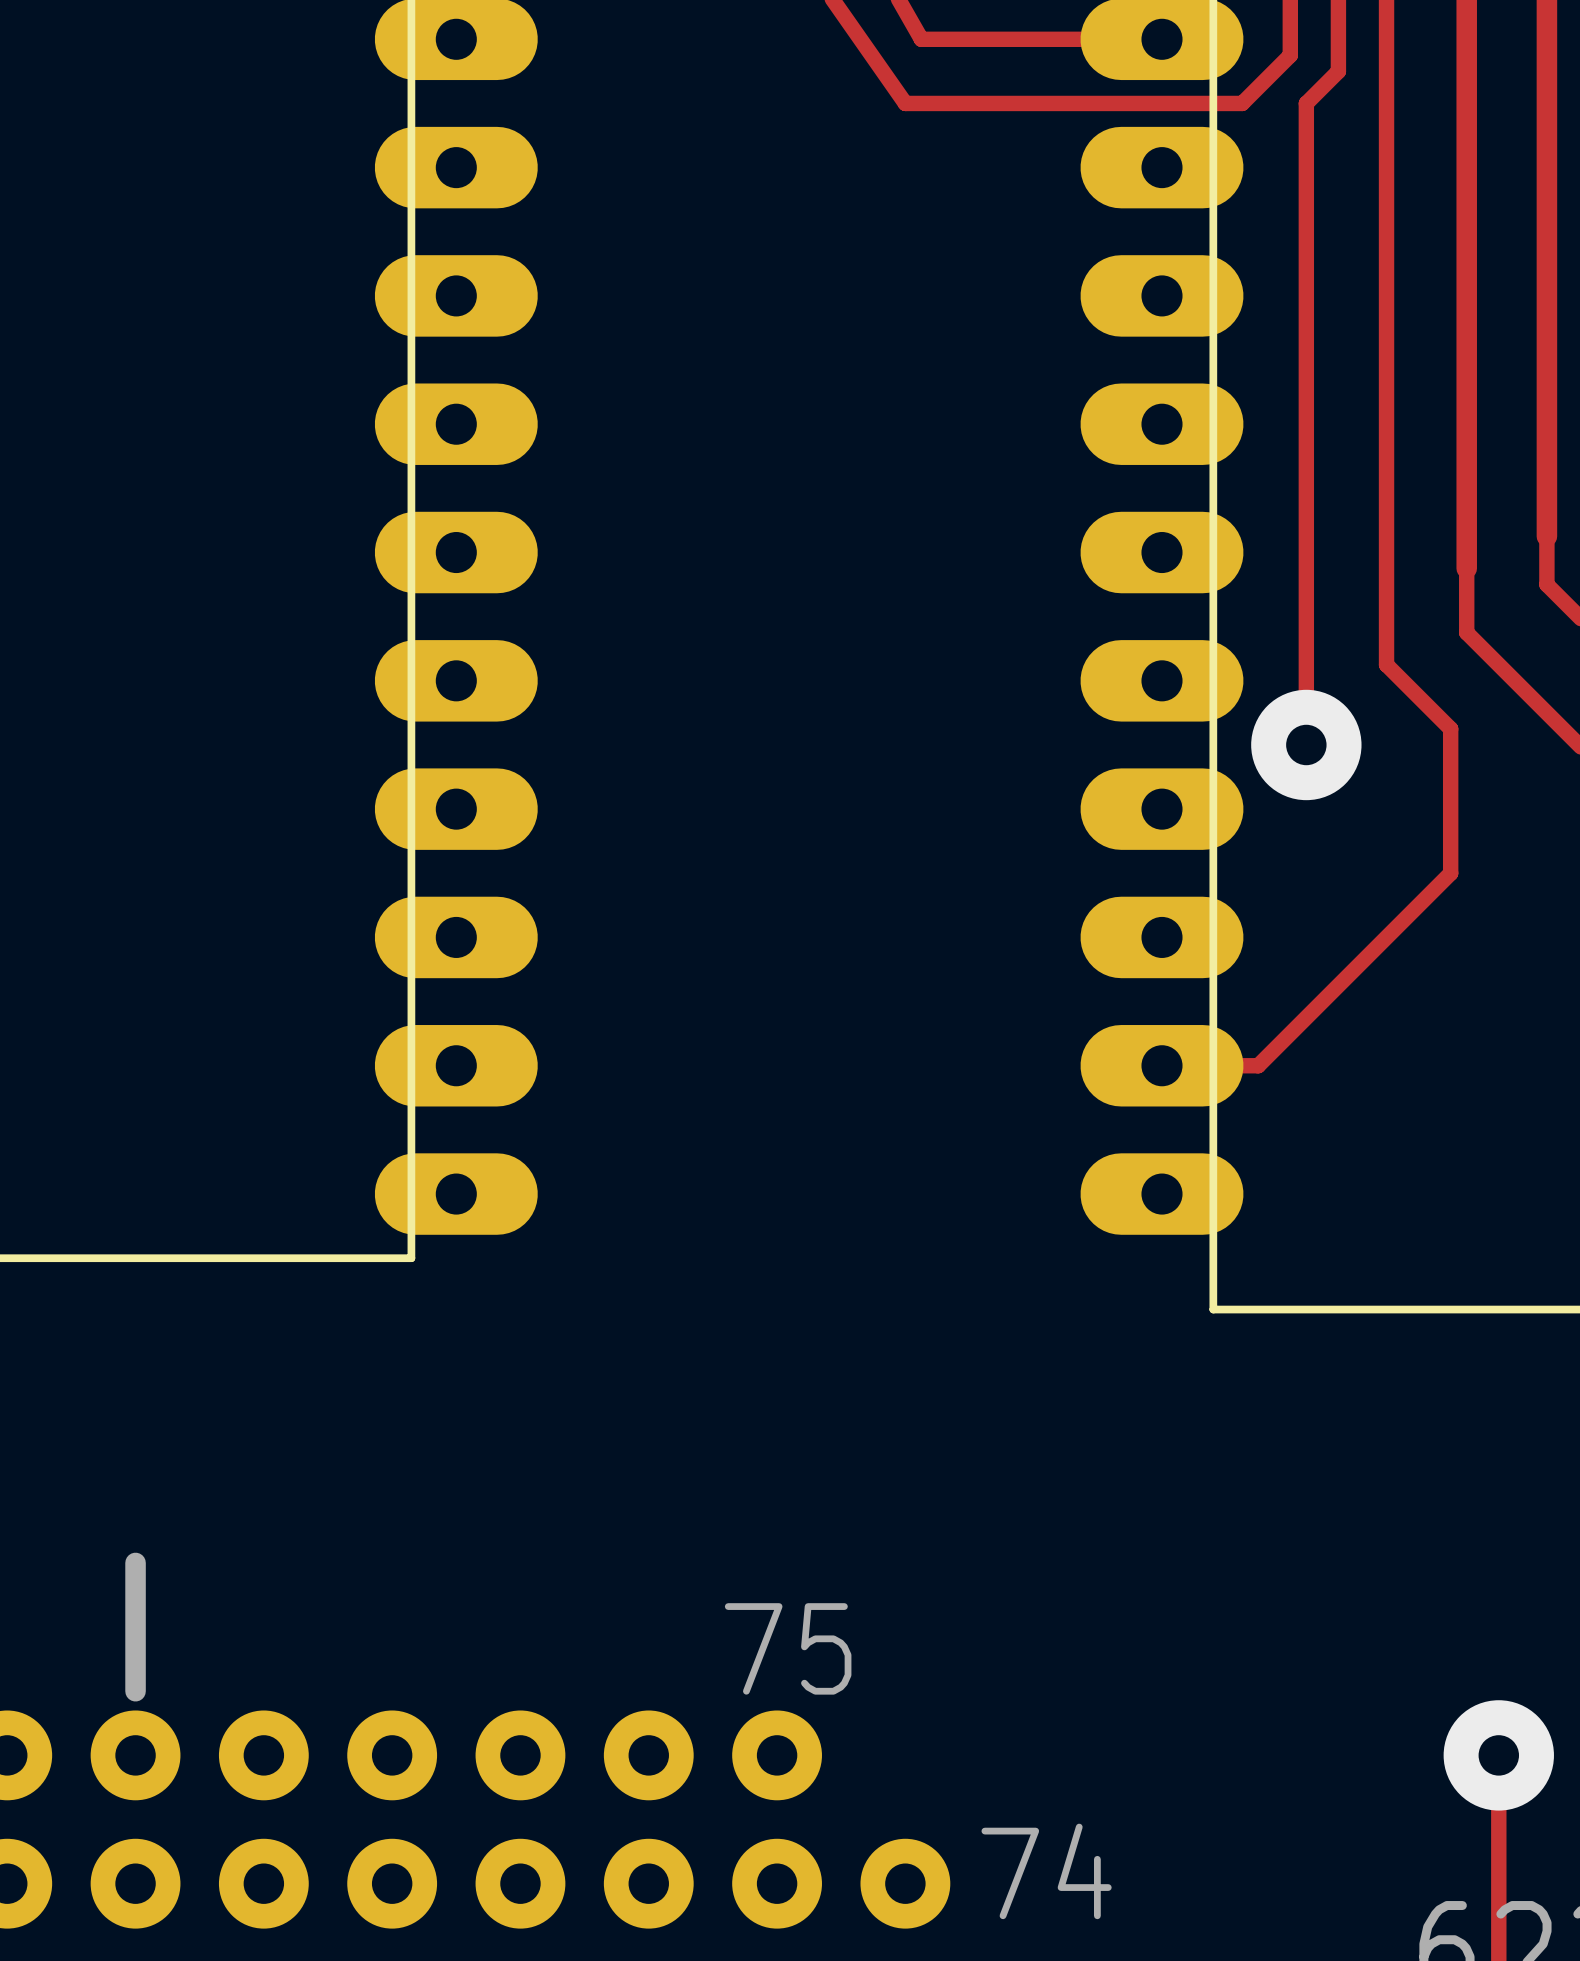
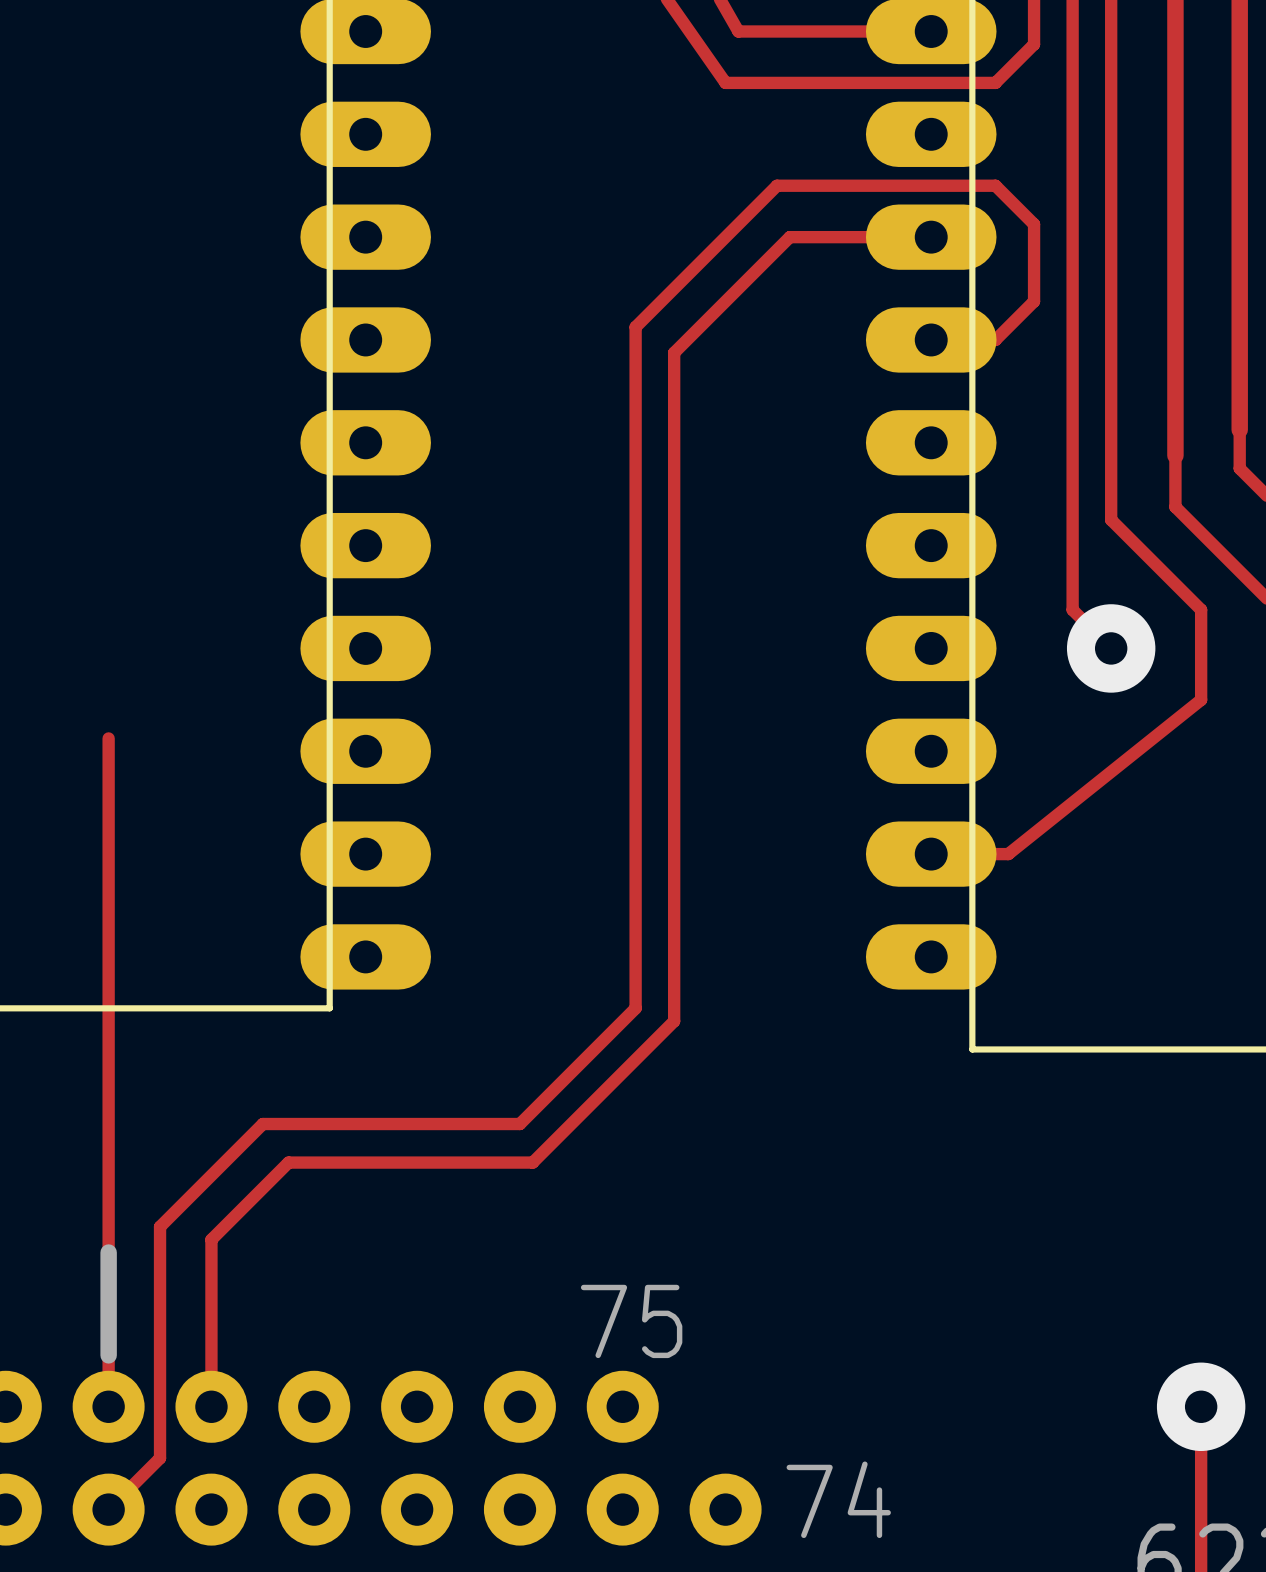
track: (1338, 71) (1306, 103) (1306, 744) -> (1072, 57) (1072, 609) (1111, 648)
track: none -> (931, 237) (789, 237) (674, 352) (674, 1021) (532, 1162) (288, 1162) (211, 1239) (211, 1406)
track: none -> (931, 339) (995, 339) (1034, 301) (1034, 224) (995, 185) (776, 185) (635, 327) (635, 1008) (519, 1124) (262, 1124) (160, 1226) (160, 1458) (108, 1509)
track: (1386, 648) (1386, 664) (1450, 728) (1450, 873) (1258, 1065) -> (1111, 519) (1201, 609) (1201, 699) (1008, 854)
via position: (1306, 744) -> (1111, 648)
track: none -> (108, 738) (108, 1406)

